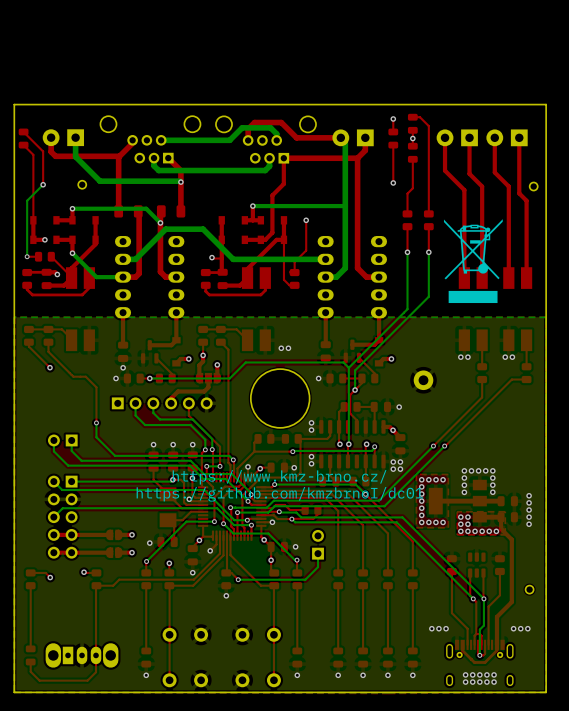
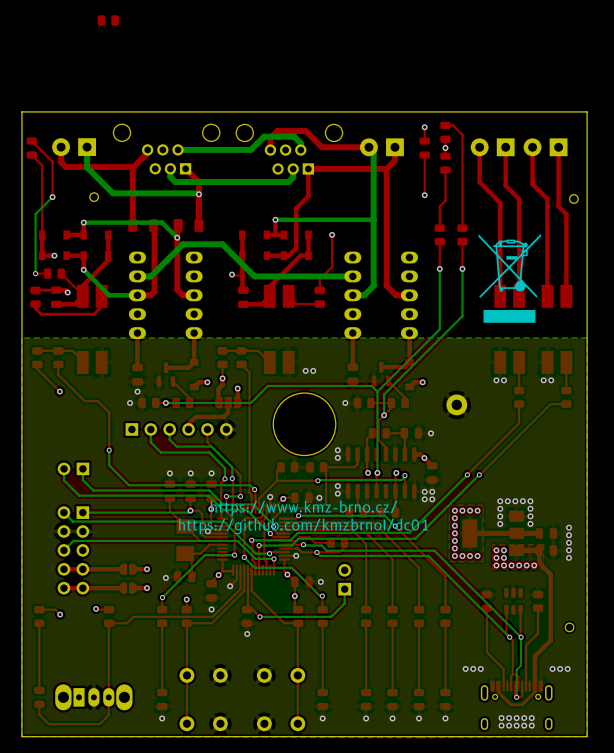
part: none -> (108, 20)
top track: (283, 239) (283, 279) (289, 285) -> (288, 296) (296, 304) (314, 304)
top track: (222, 272) (205, 272) -> none
part: (205, 278) -> none
top track: (265, 278) (265, 290) (260, 294) (209, 294) (205, 291) (205, 285) -> none

